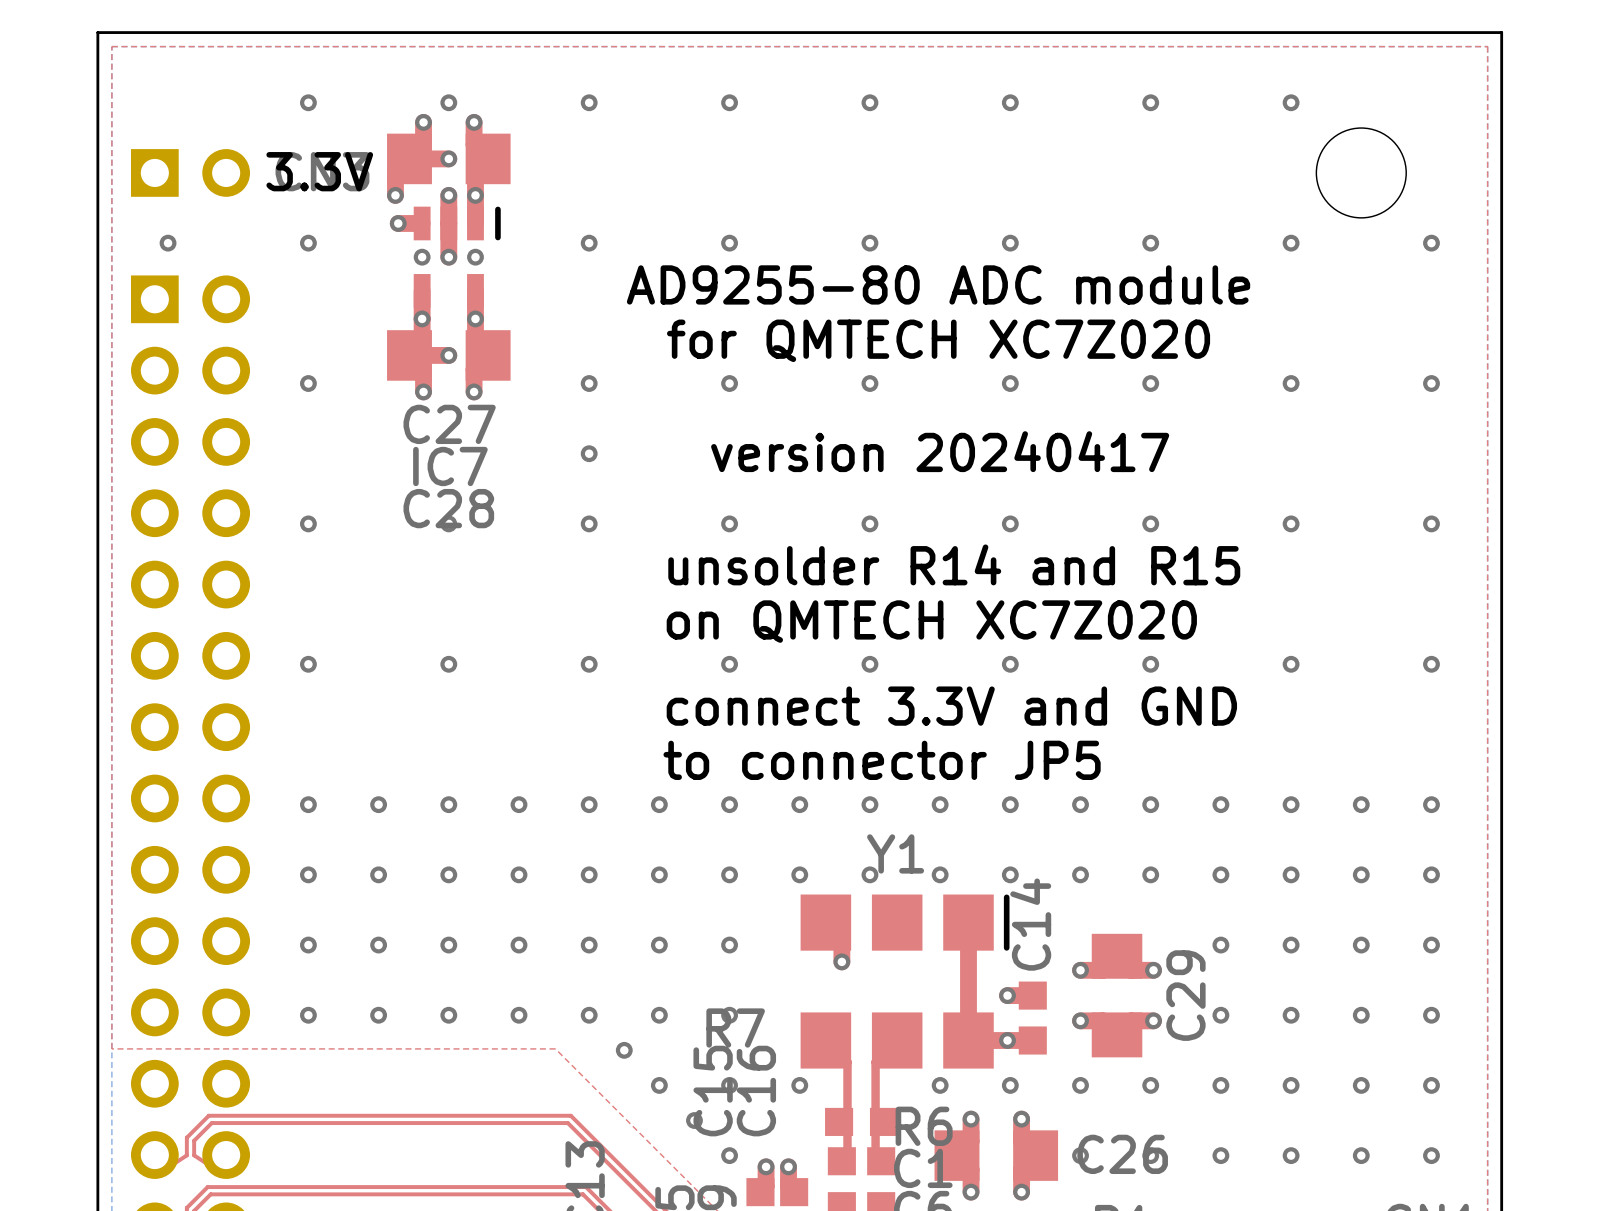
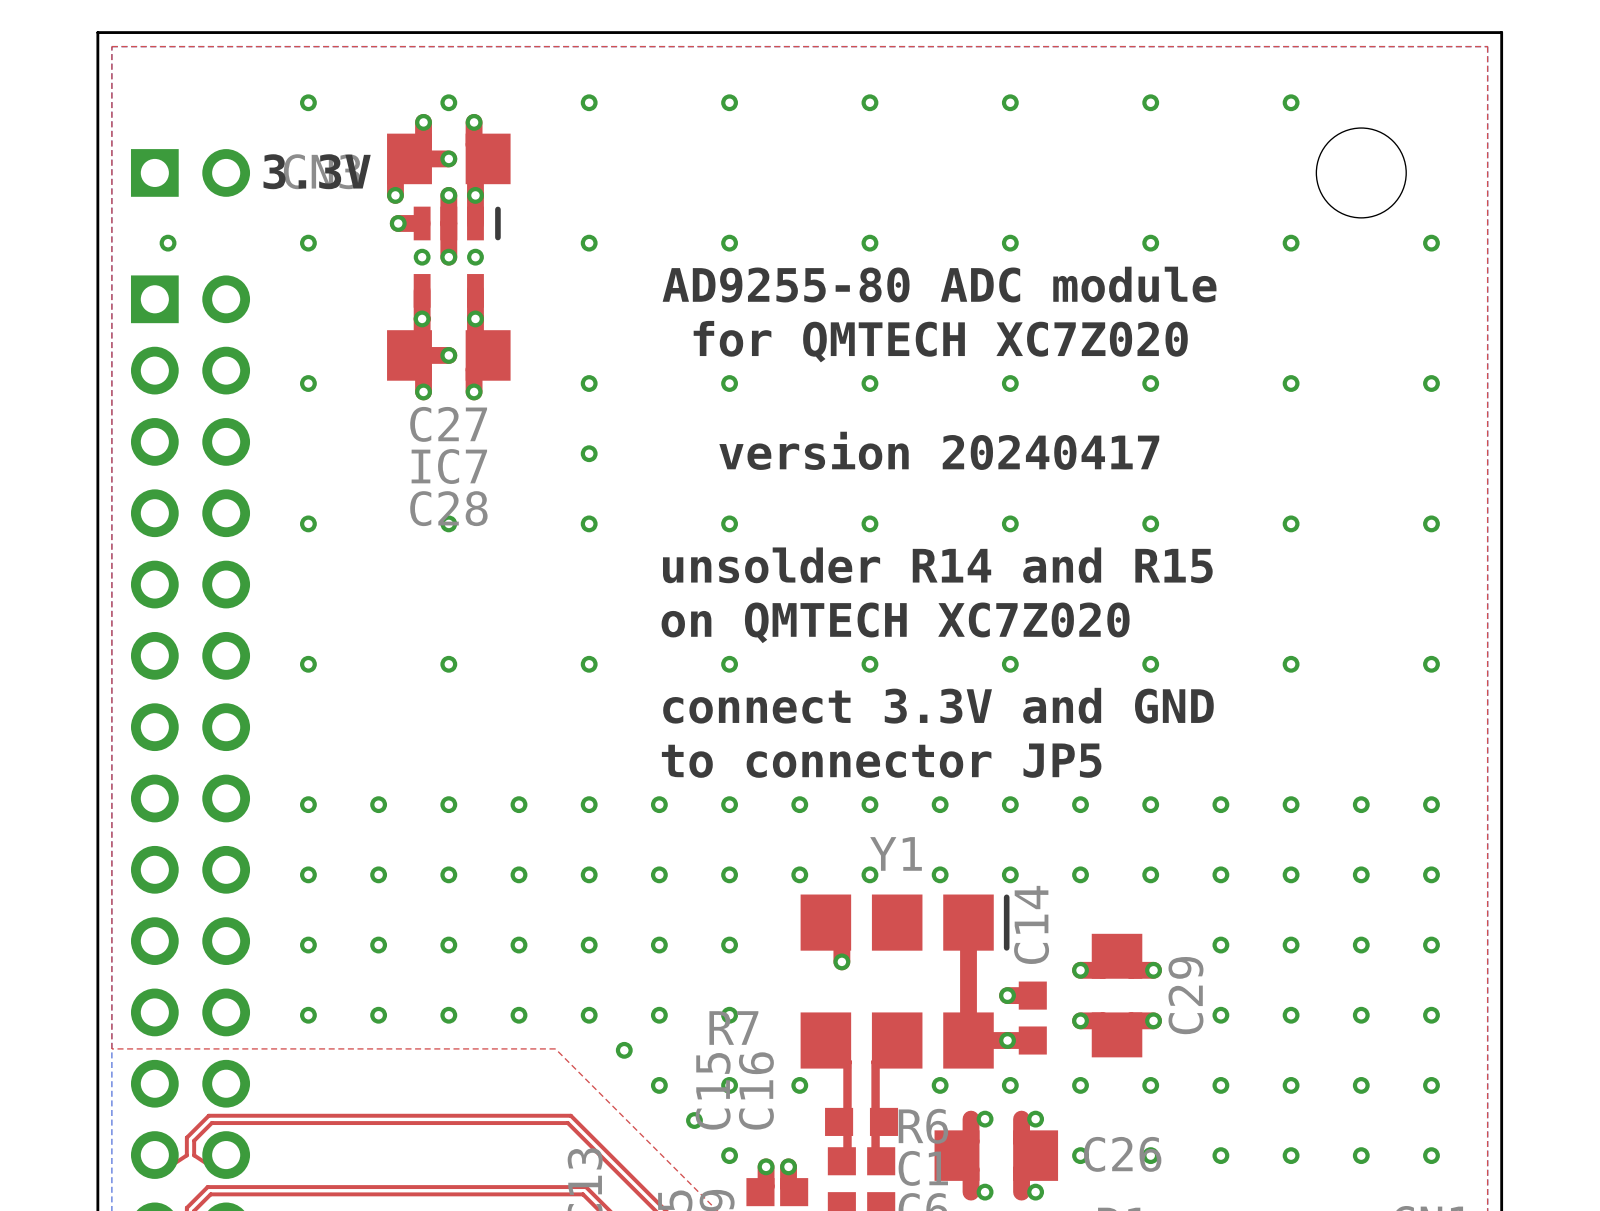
via position: (971, 1119) -> (985, 1119)
via position: (1021, 1119) -> (1035, 1119)
via position: (971, 1192) -> (985, 1192)
via position: (1021, 1192) -> (1035, 1192)

